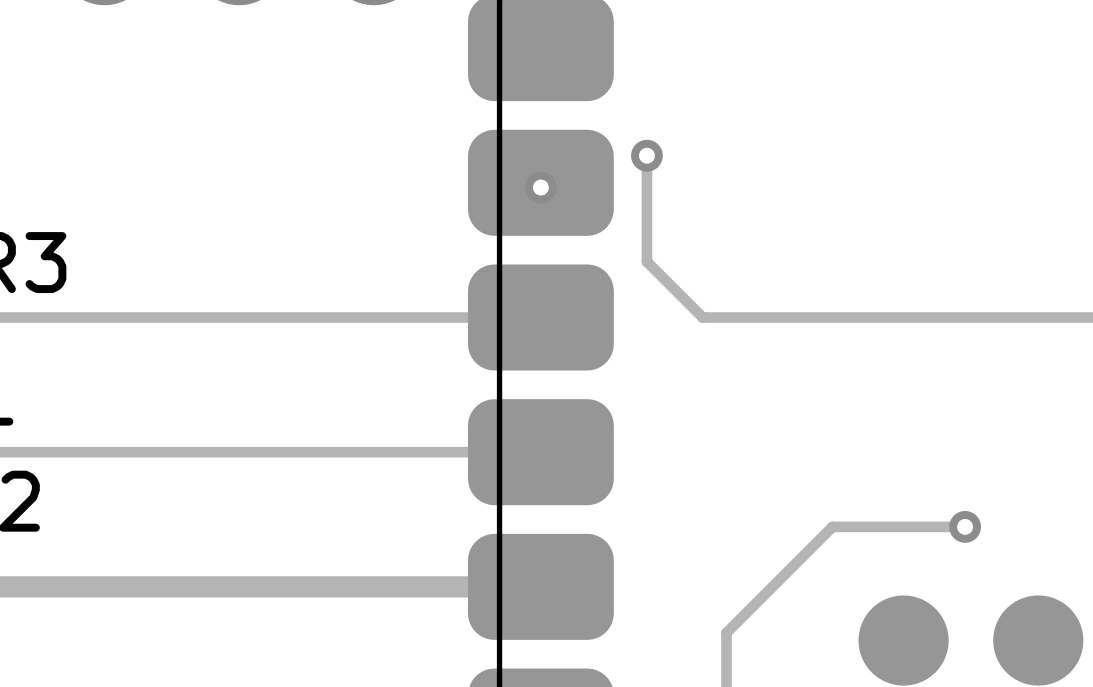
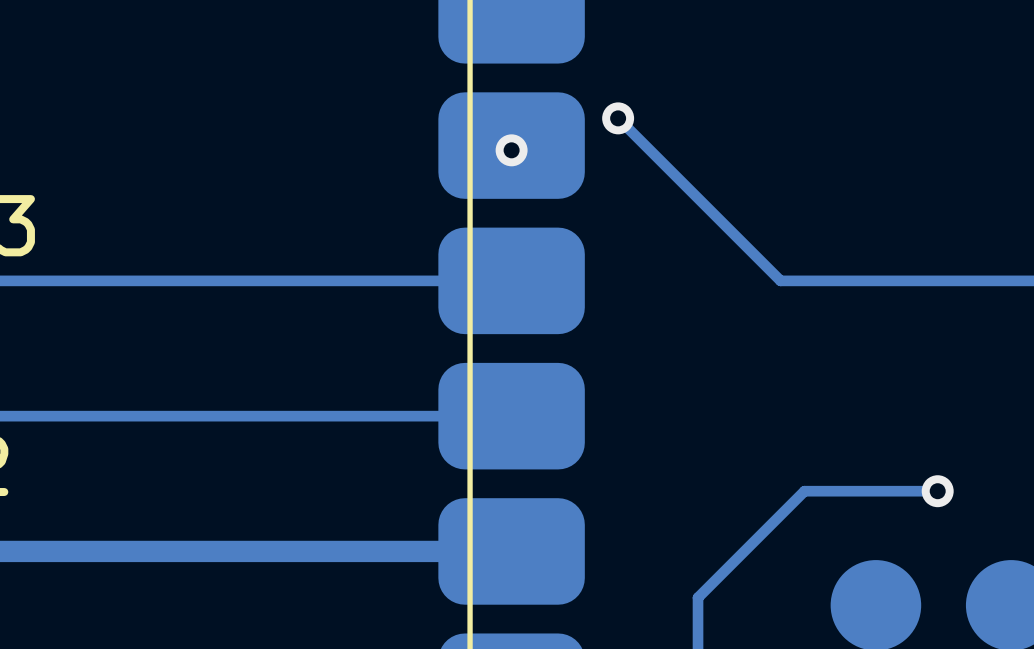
track: (646, 155) (646, 261) (702, 317) (808, 317) -> (618, 118) (780, 280)

